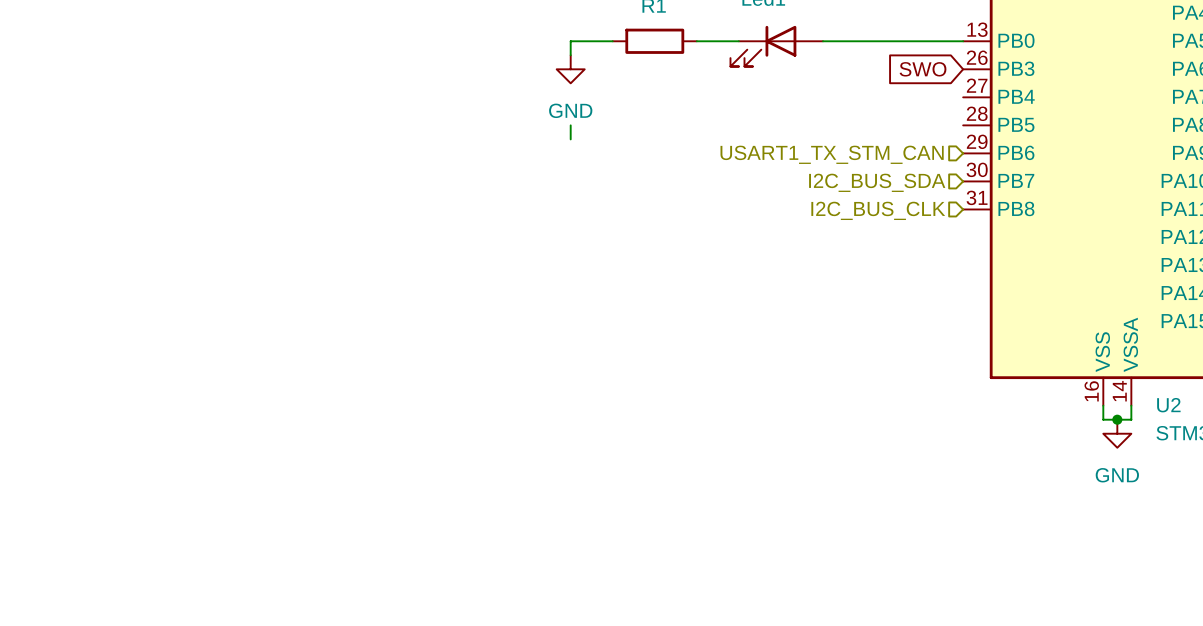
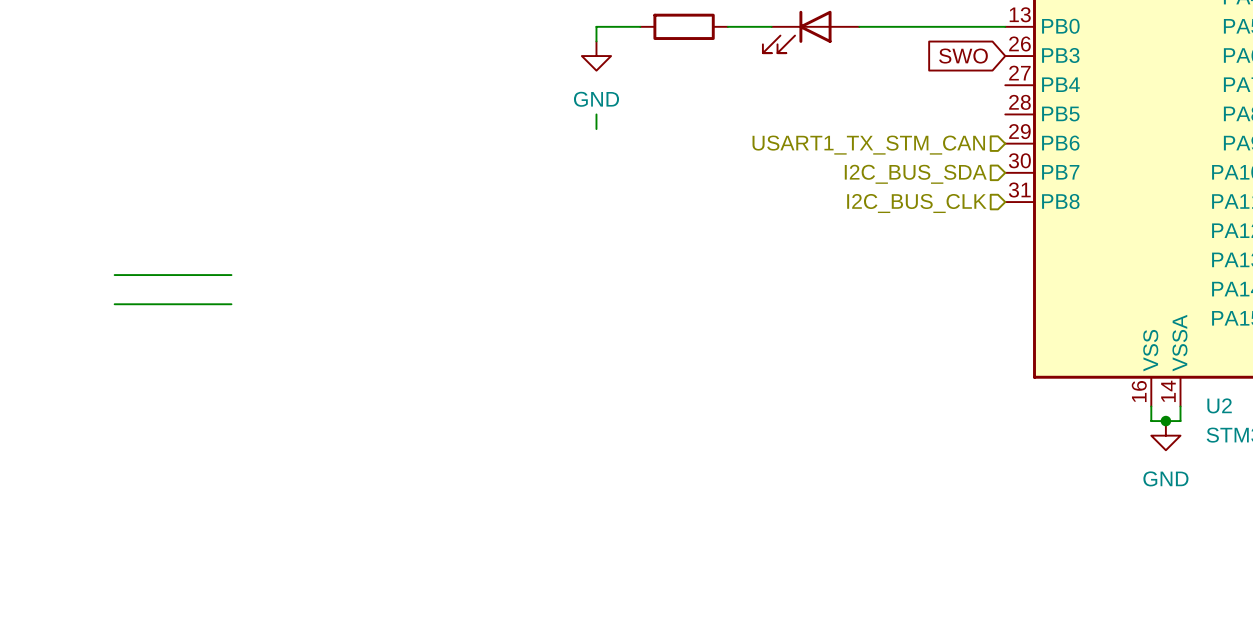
wire: none -> (114, 275) (231, 275)
wire: none -> (114, 304) (231, 304)

